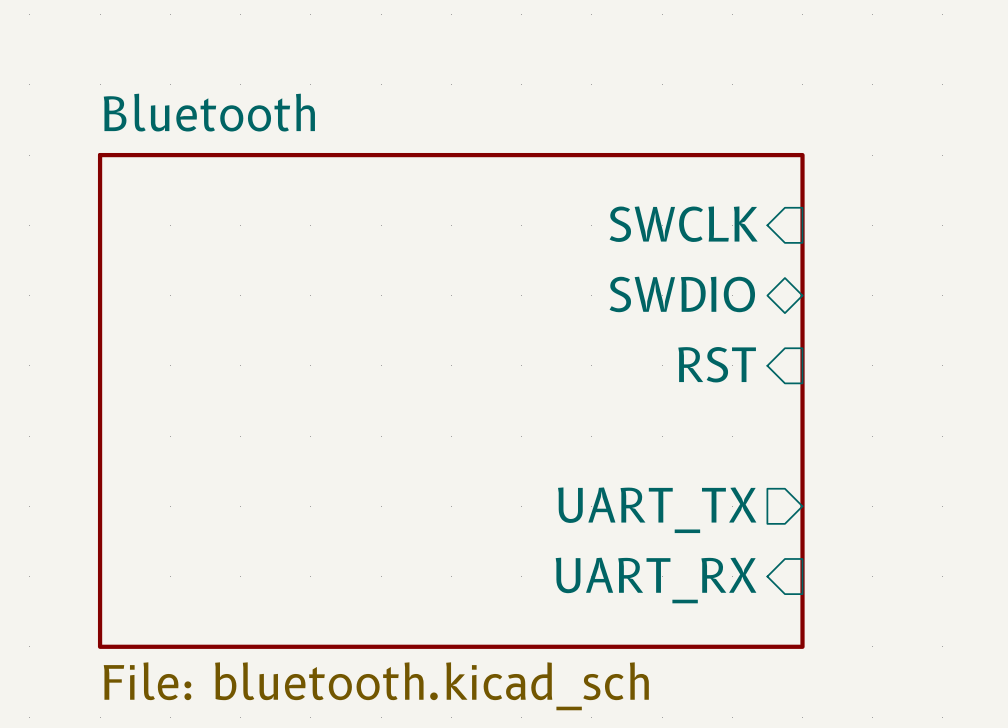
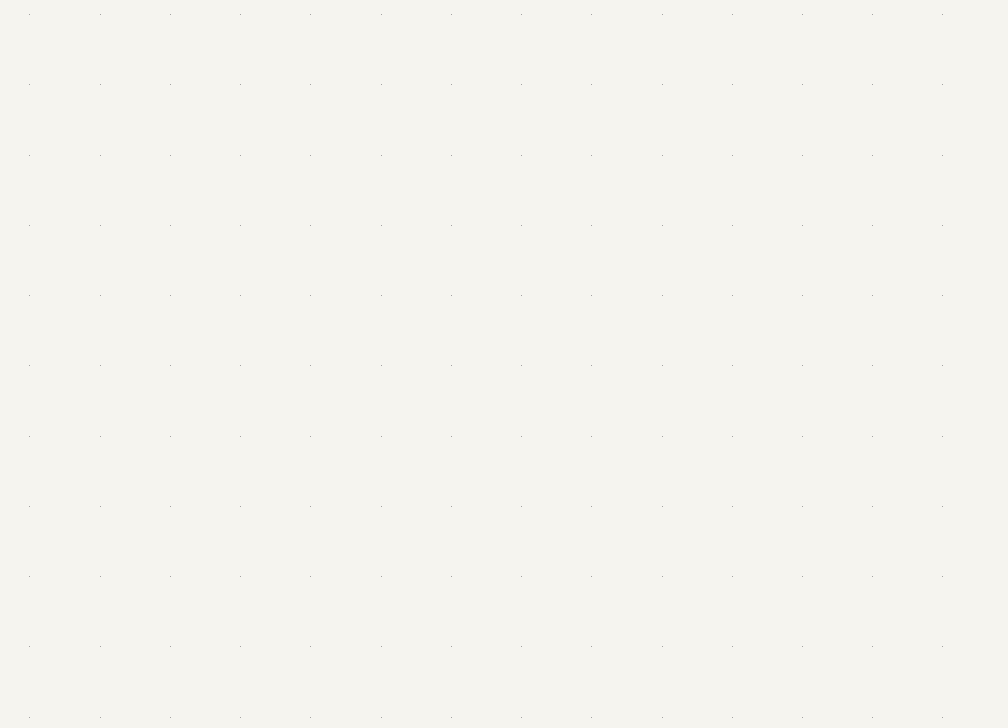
sheet pin: SWCLK (683, 224) -> none
sheet pin: SWDIO (682, 294) -> none
sheet pin: RST (717, 364) -> none
sheet Bluetooth: File: bluetooth.kicad_sch (451, 400) -> none
sheet pin: UART_TX (657, 510) -> none
sheet pin: UART_RX (656, 580) -> none

